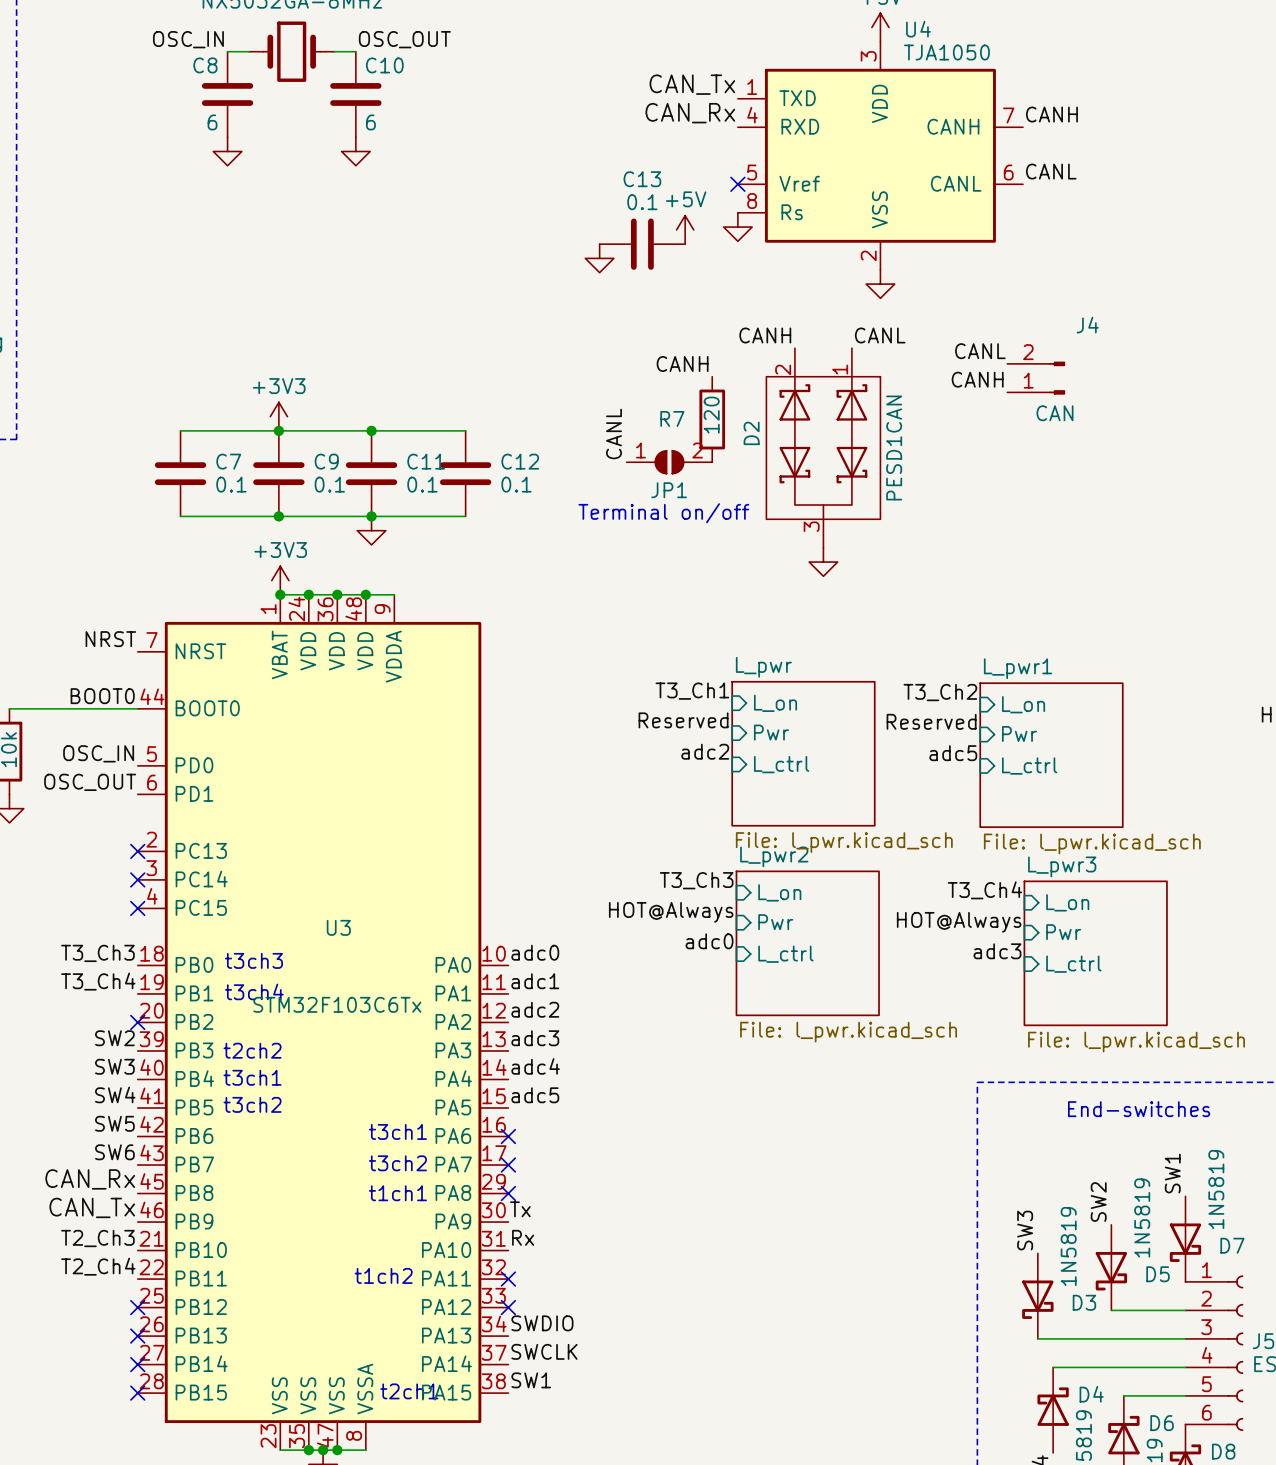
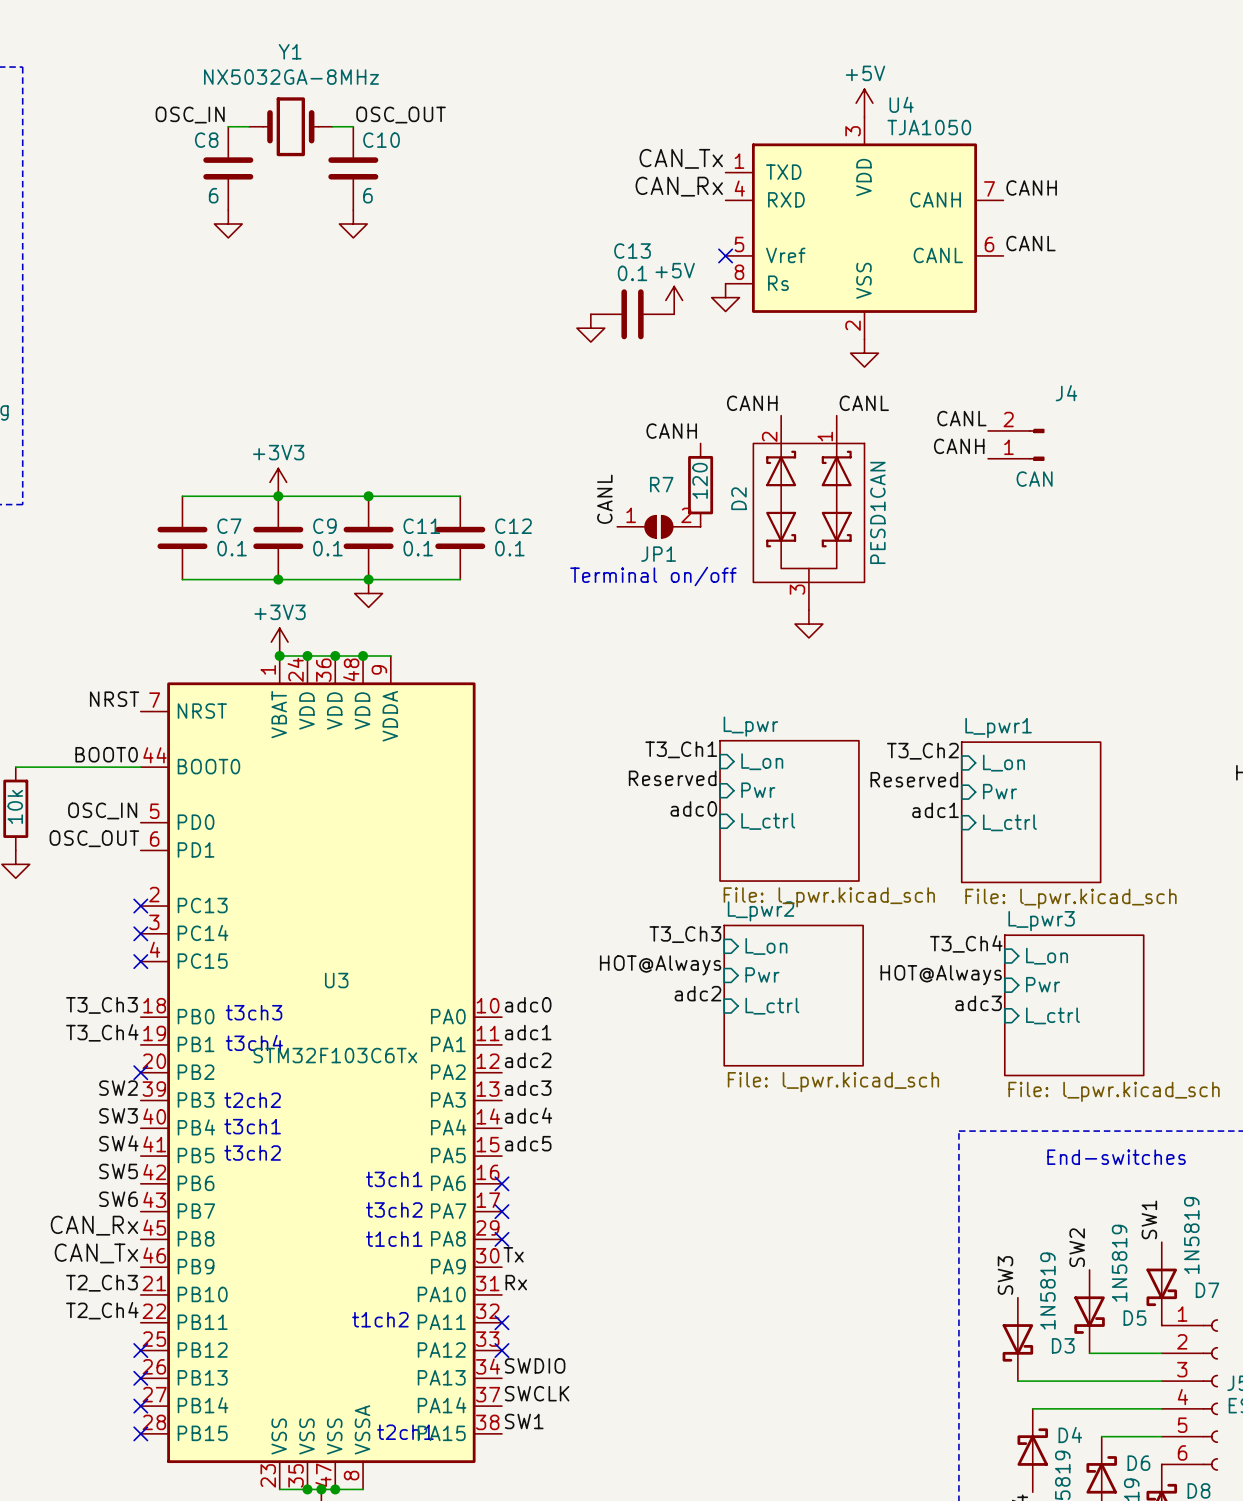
label: adc2 (705, 751) -> adc0 (693, 808)
label: adc5 (953, 753) -> adc1 (935, 810)
label: adc0 (709, 941) -> adc2 (697, 993)

